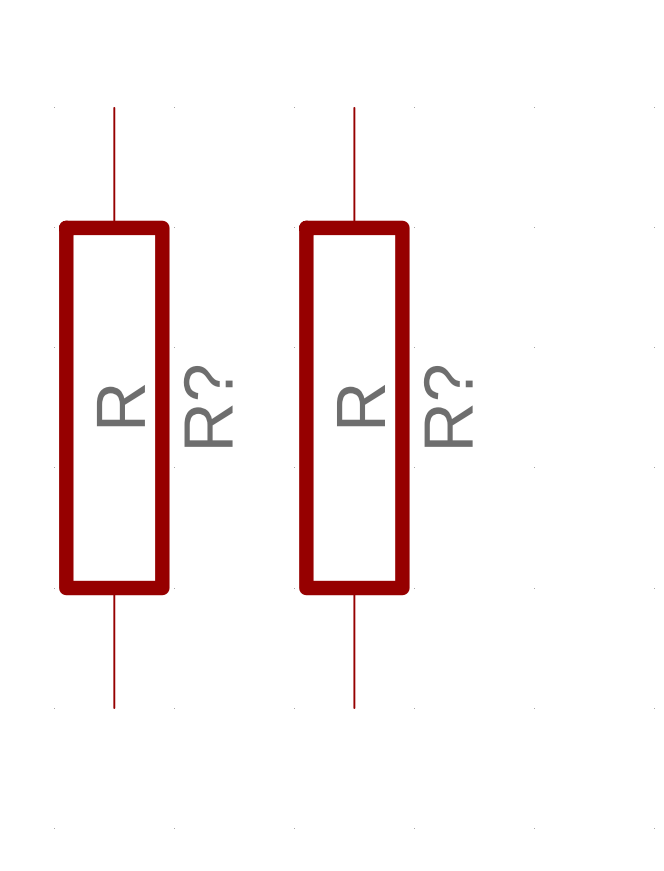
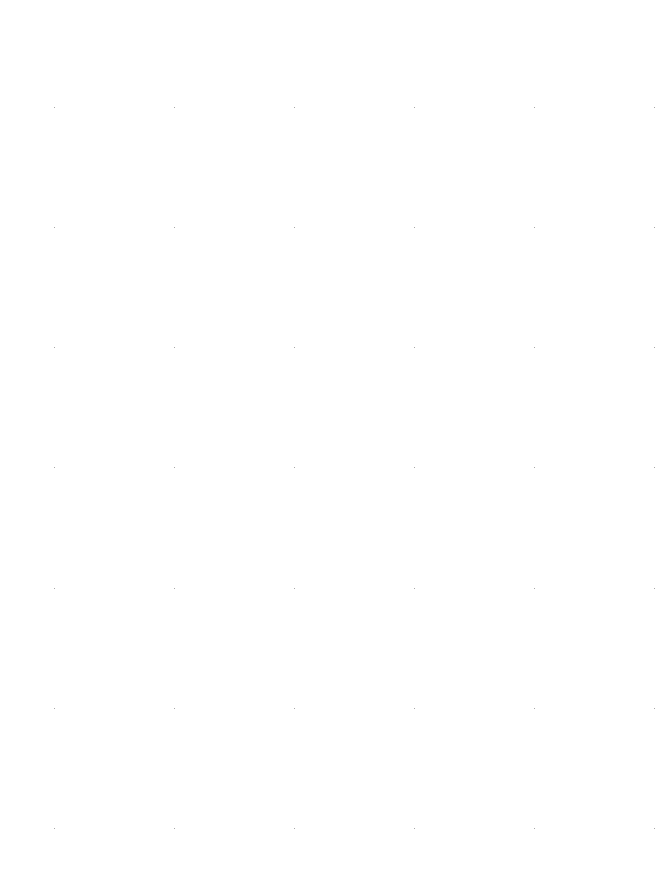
R?: R (114, 407) -> none
R?: R (354, 407) -> none

